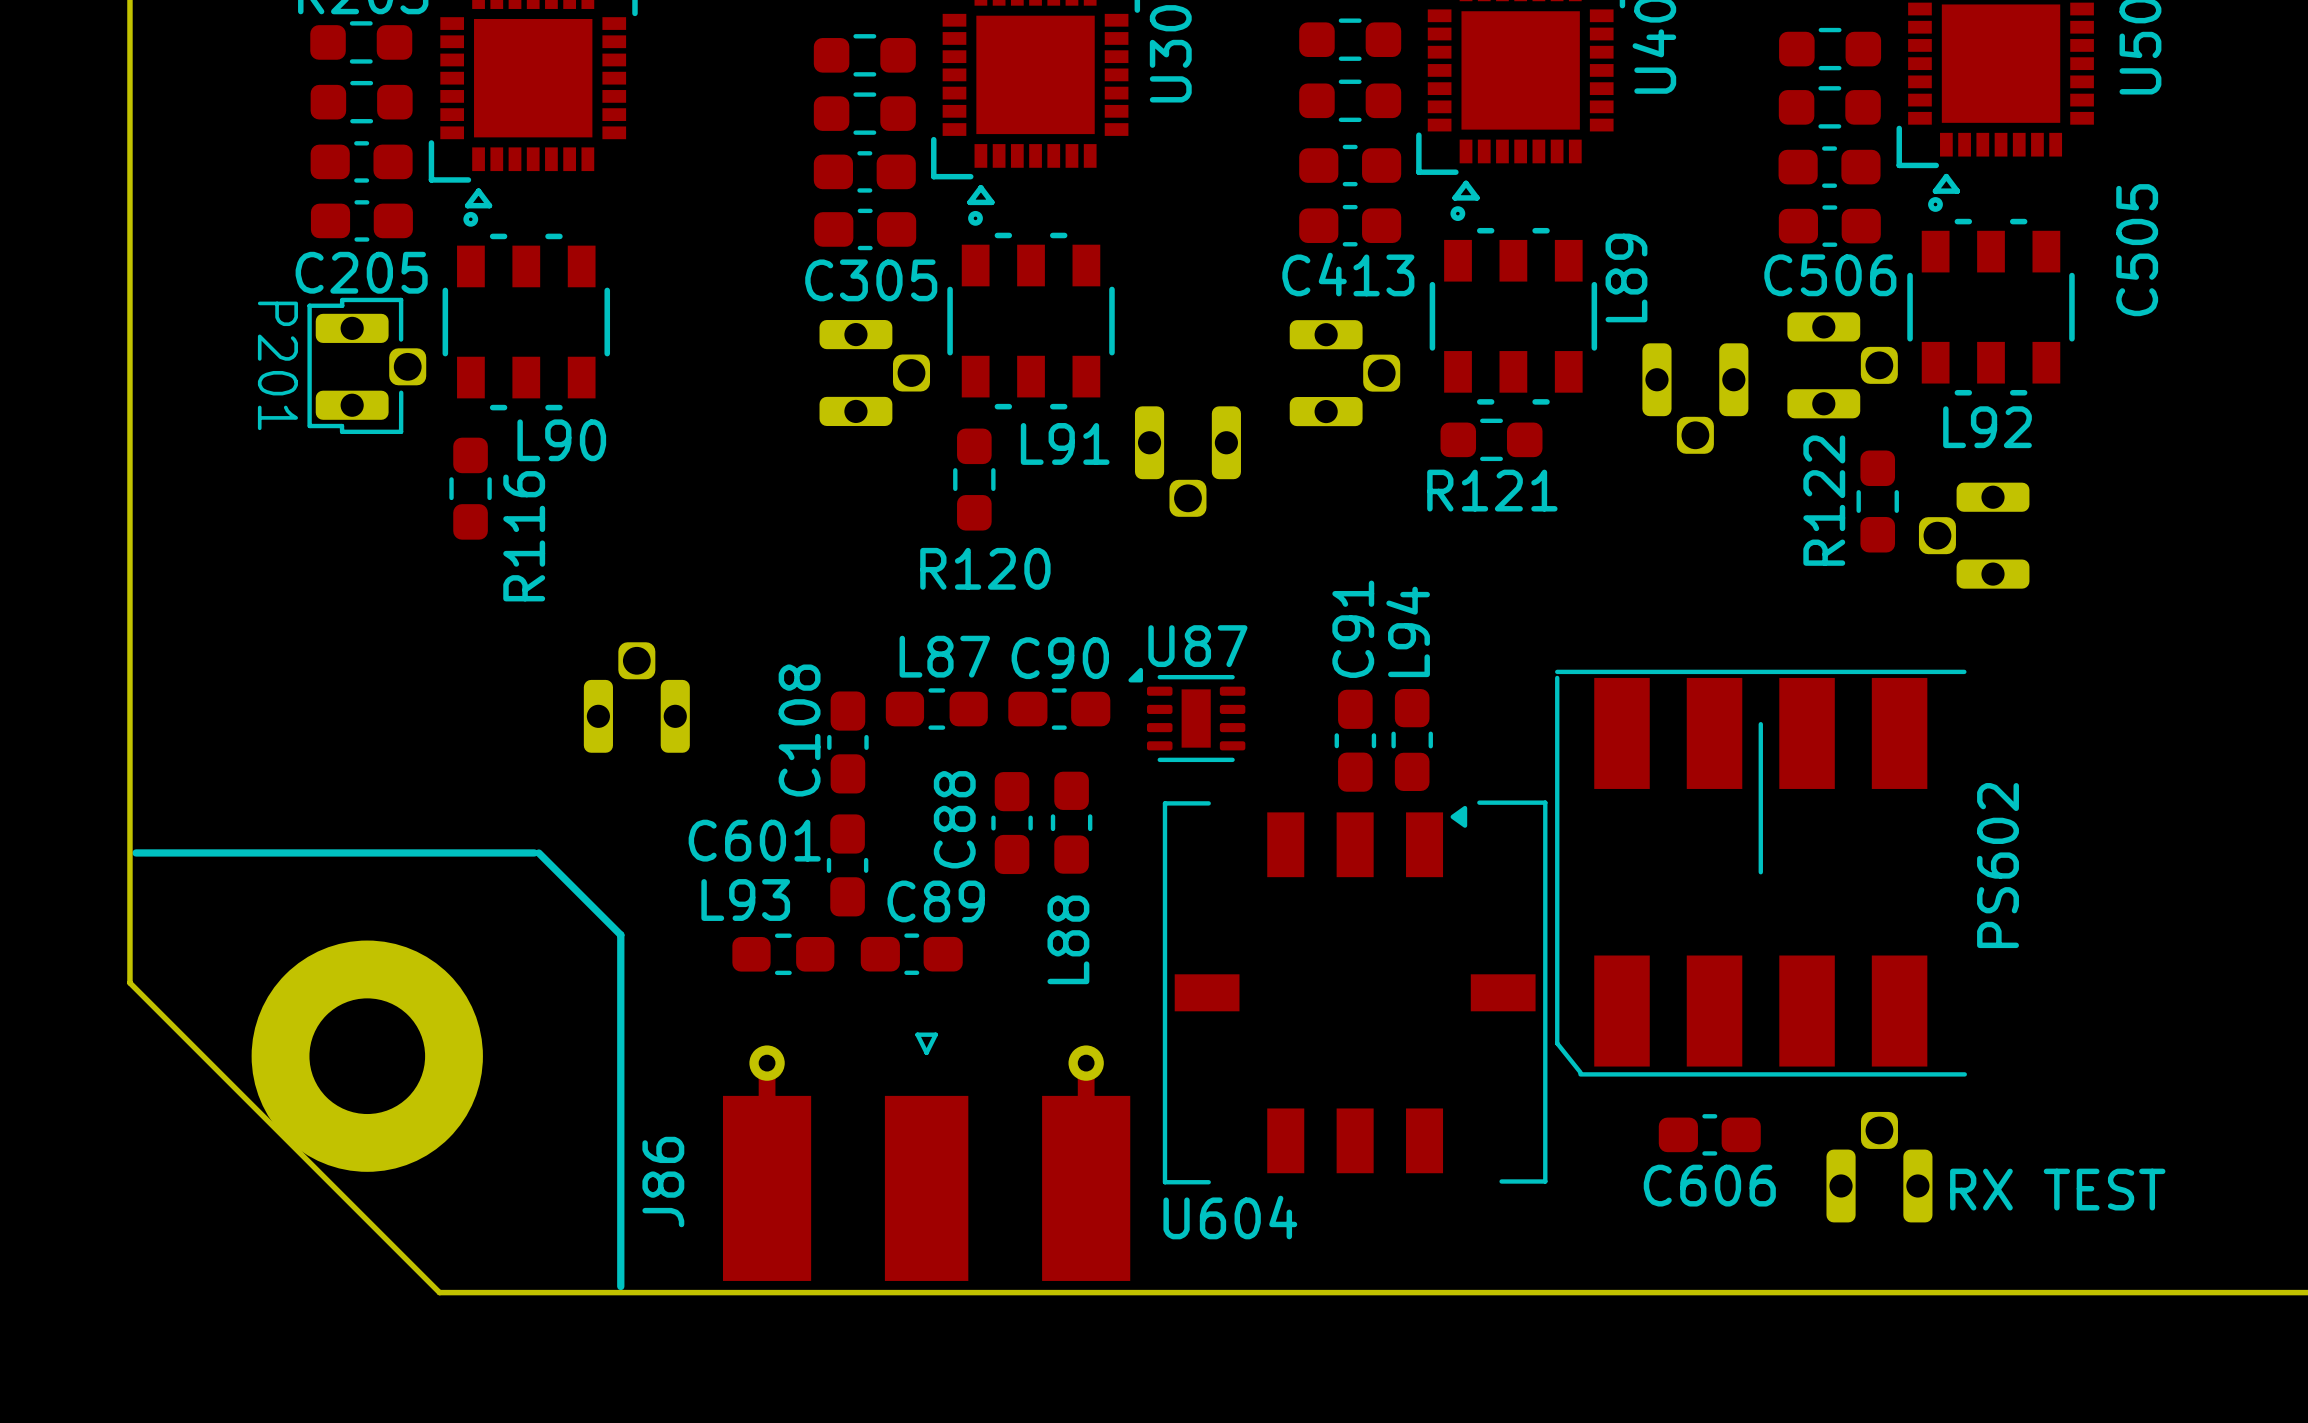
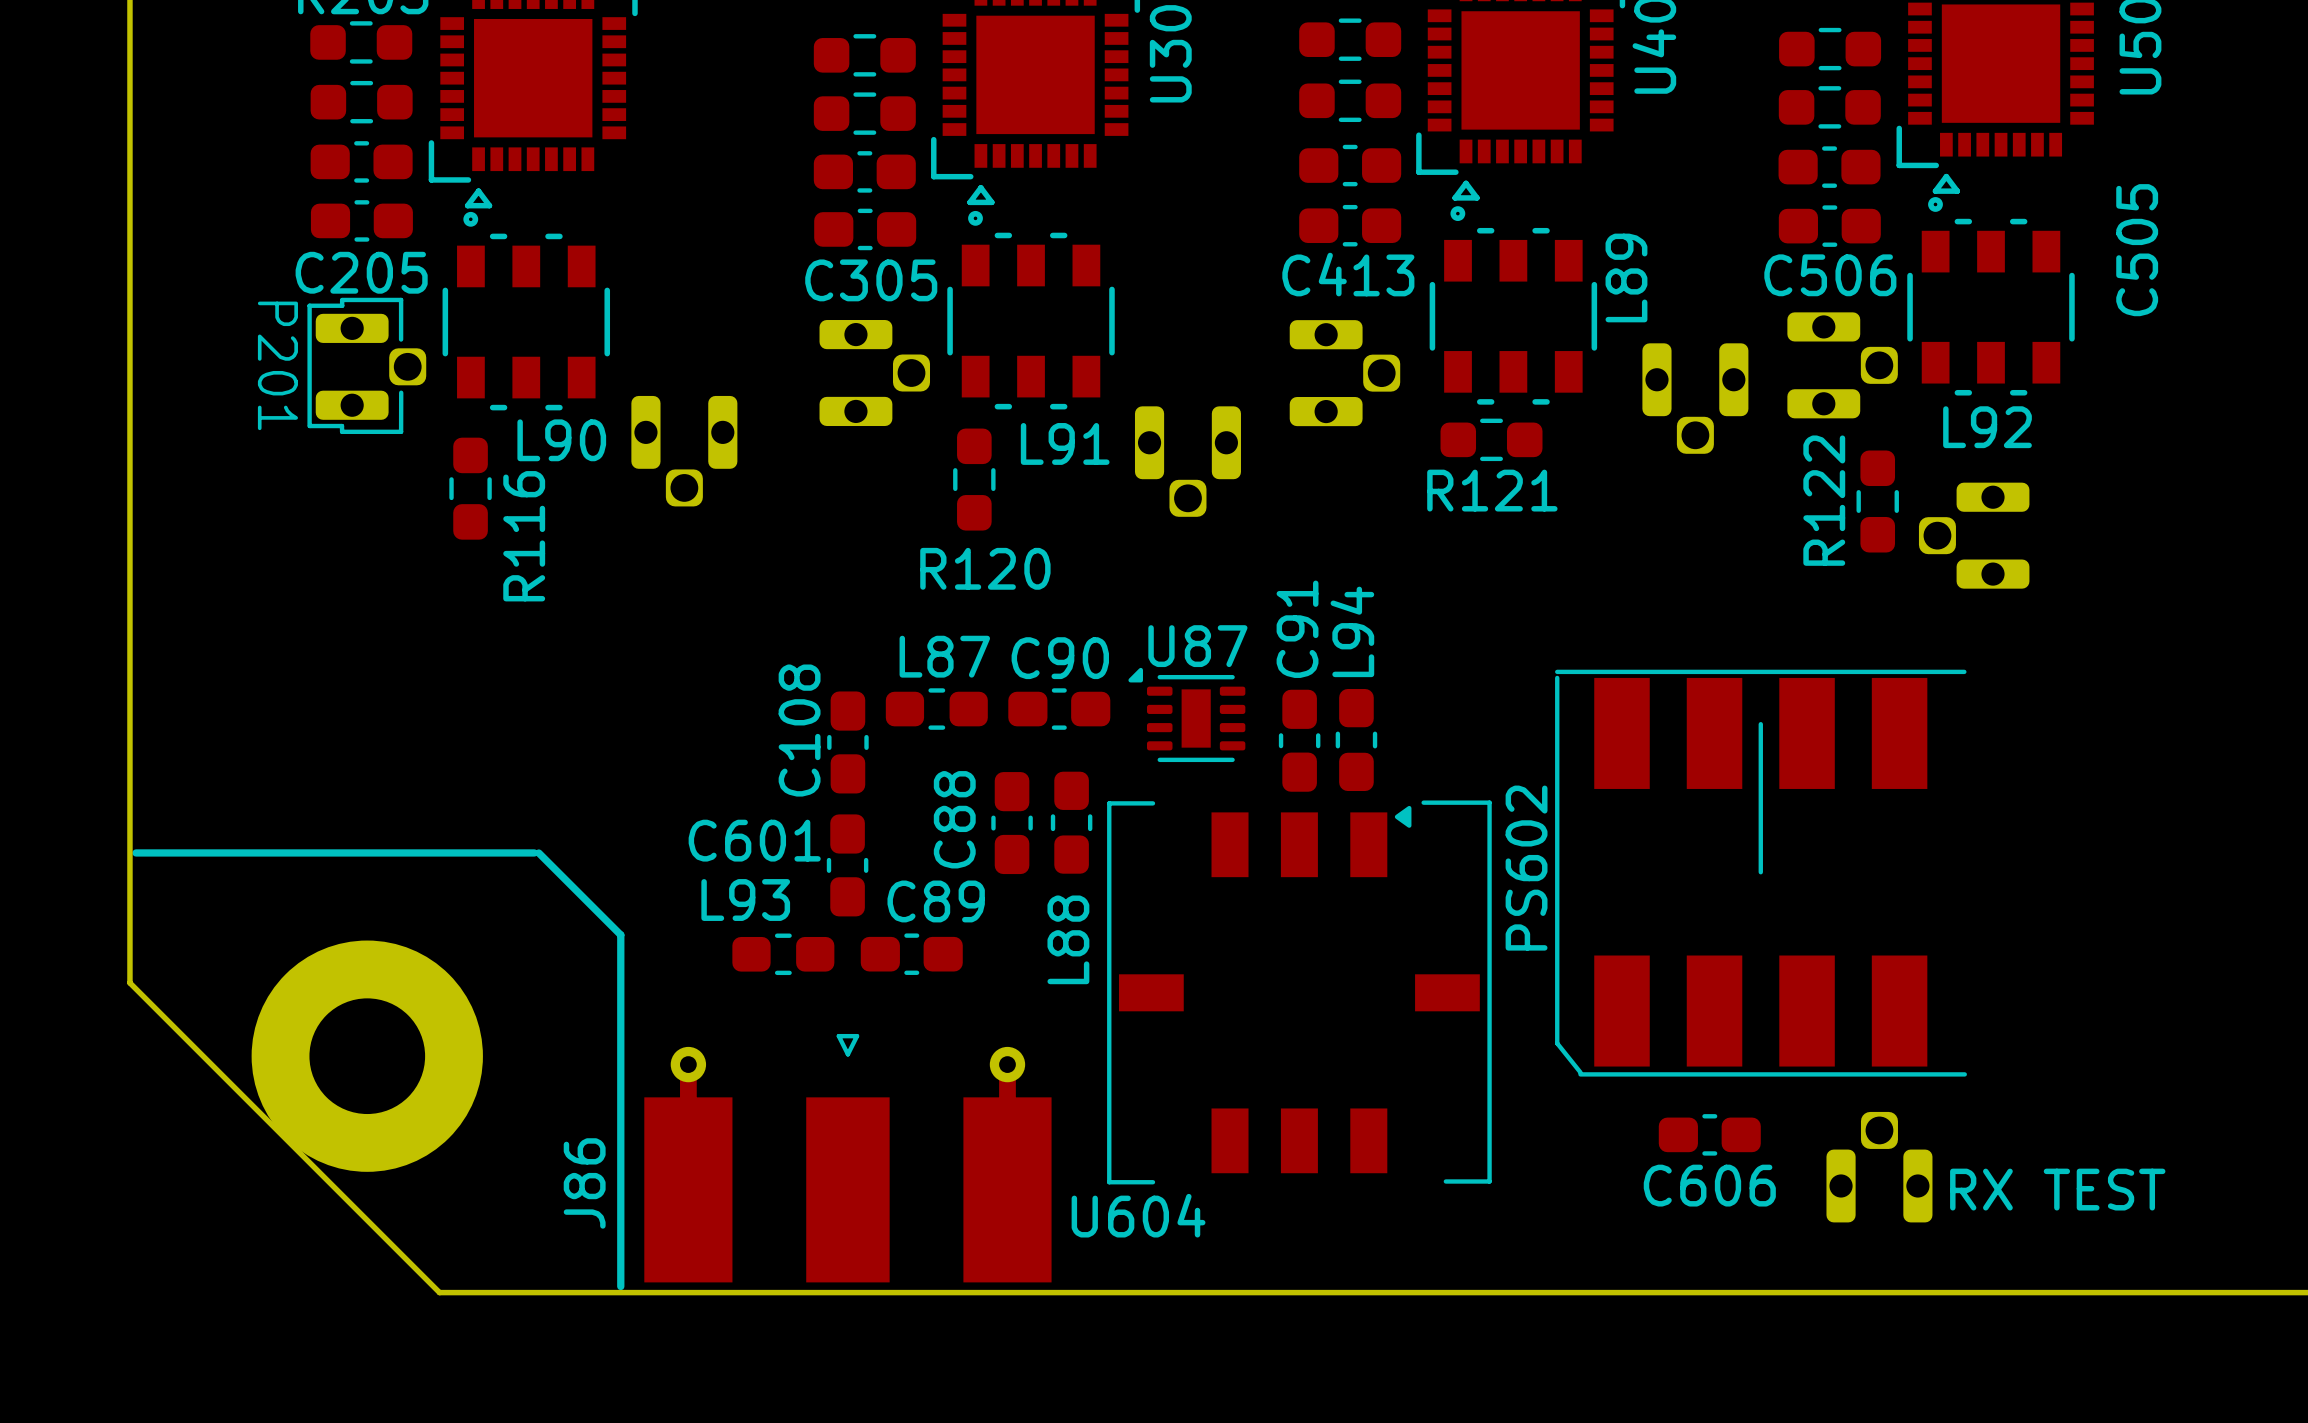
part rotation: 0° (636, 697) -> 180° (684, 451)
part position: (636, 697) -> (684, 451)
C91 position: (1355, 740) -> (1299, 740)
L94 position: (1412, 740) -> (1356, 740)
PS602 name position: PS602 (1998, 865) -> PS602 (1526, 868)
U604 position: (1355, 992) -> (1299, 992)
J86 position: (926, 1156) -> (847, 1158)
U604 name position: U604 (1230, 1217) -> U604 (1138, 1215)

